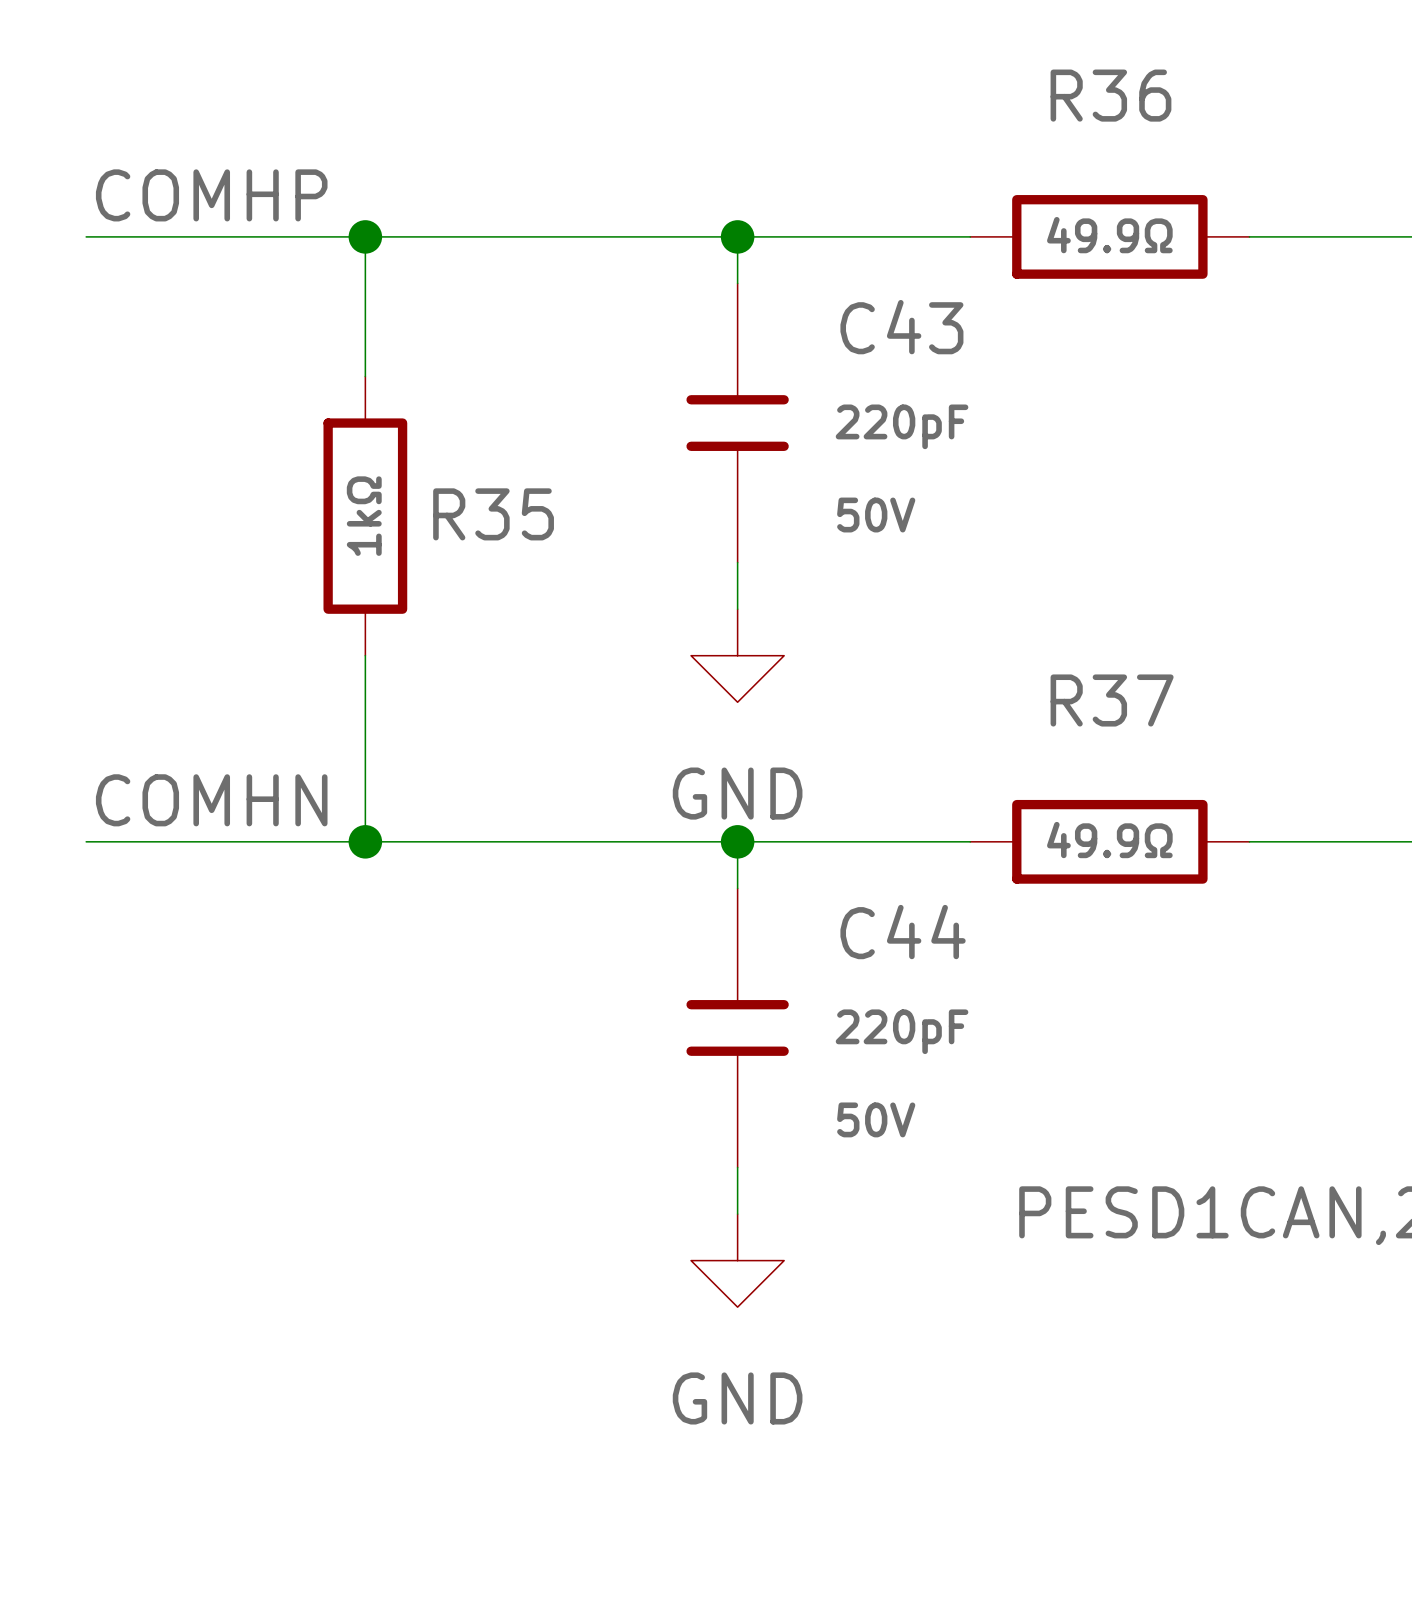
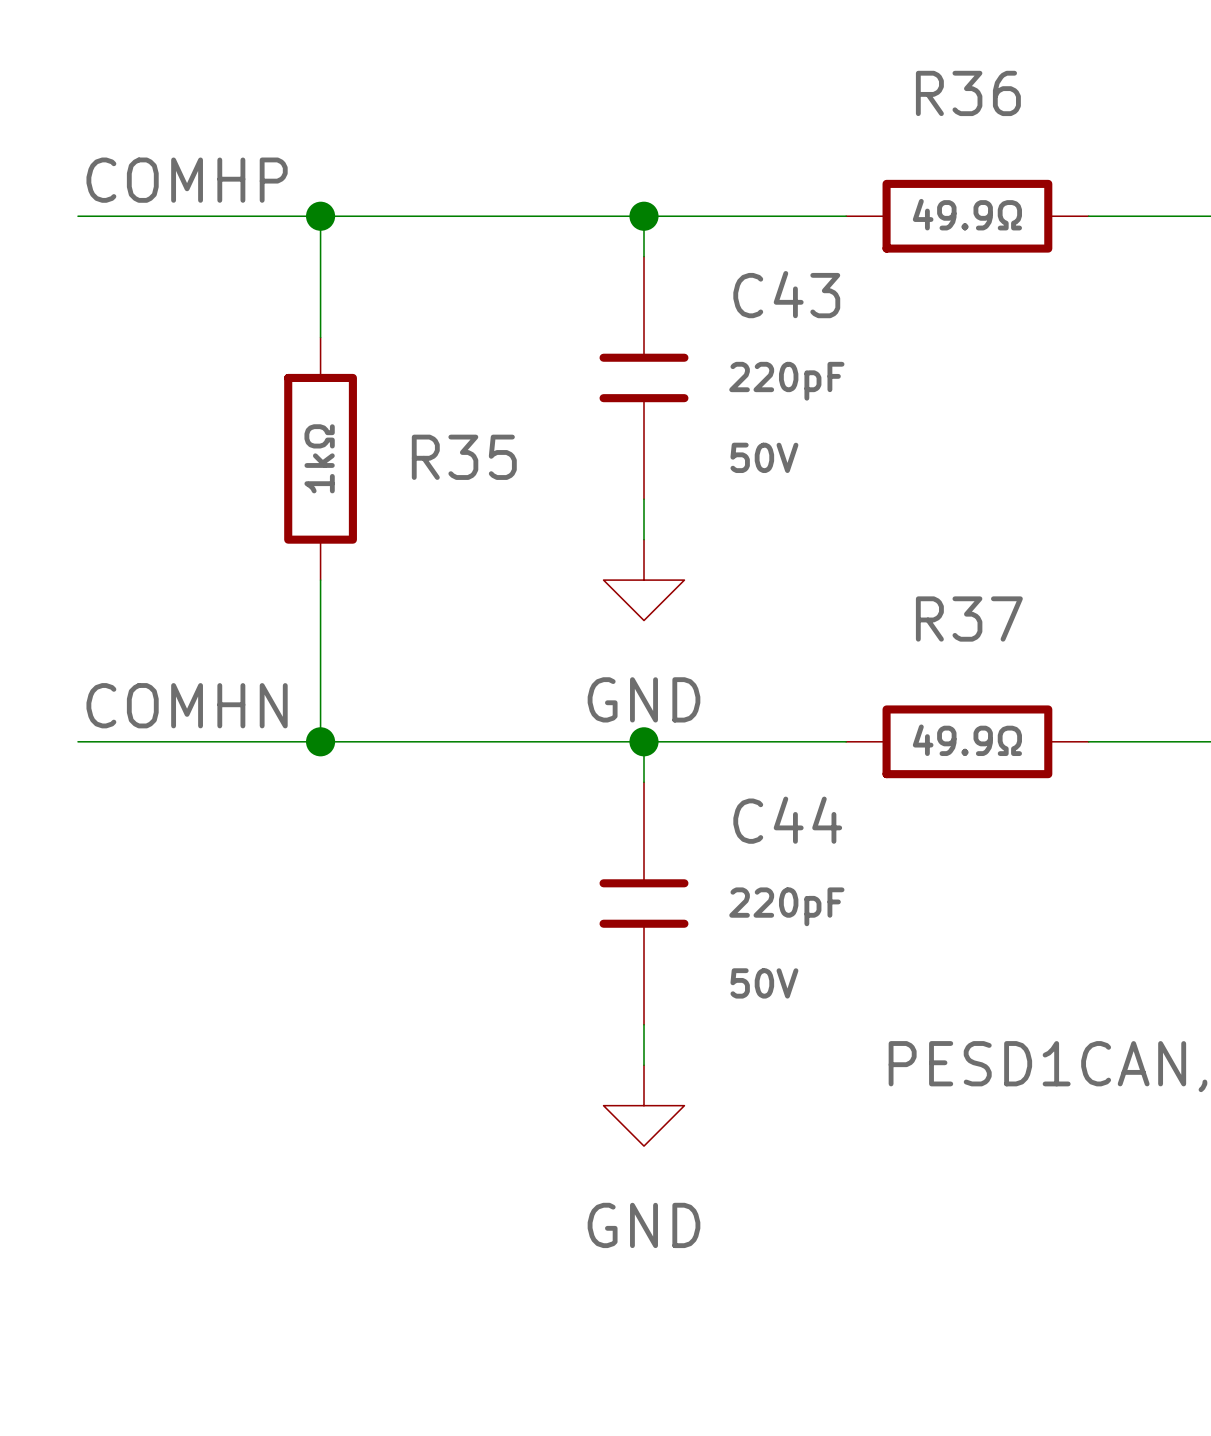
R35 name position: R35 (493, 514) -> R35 (464, 457)

